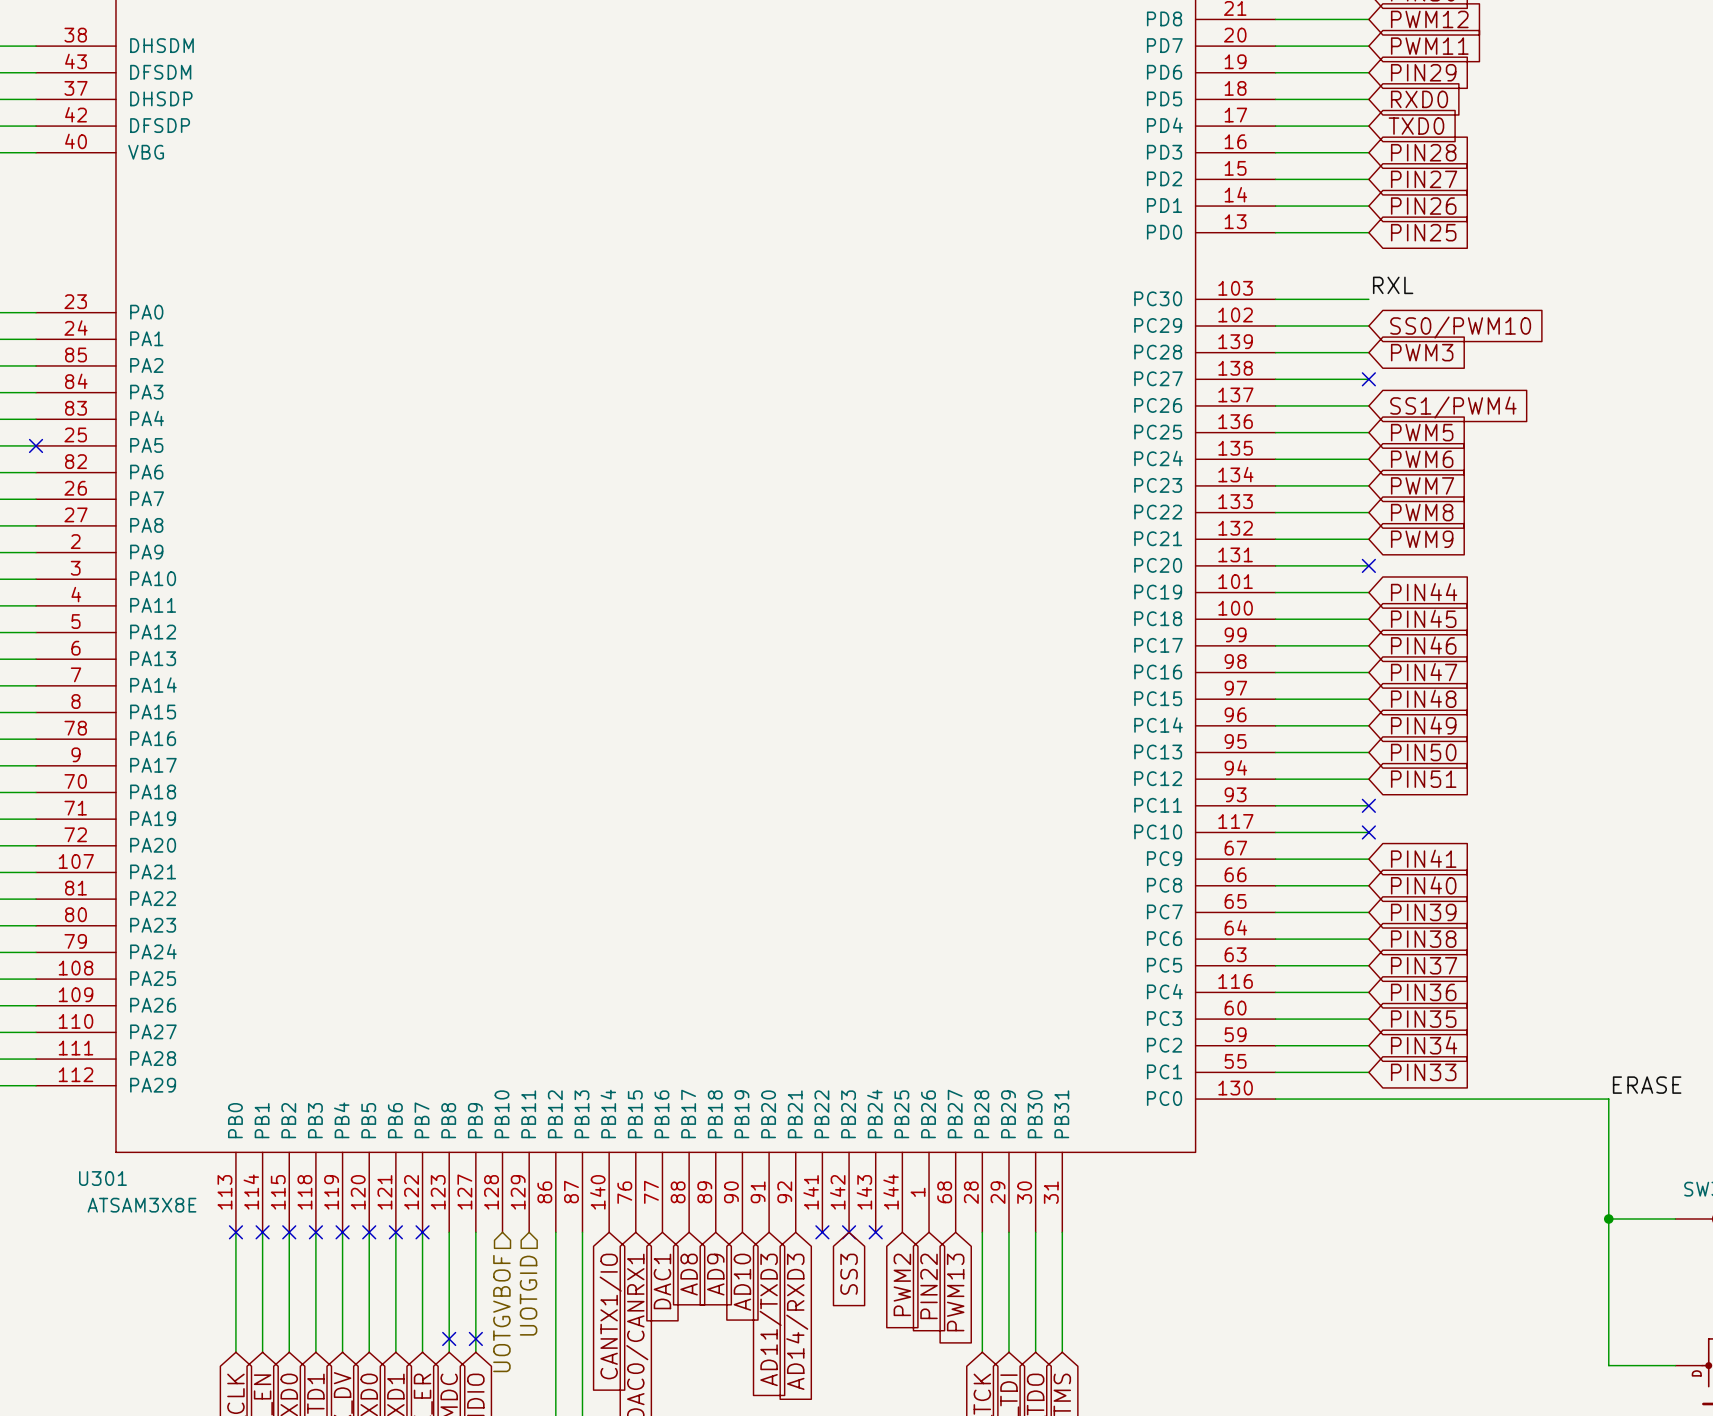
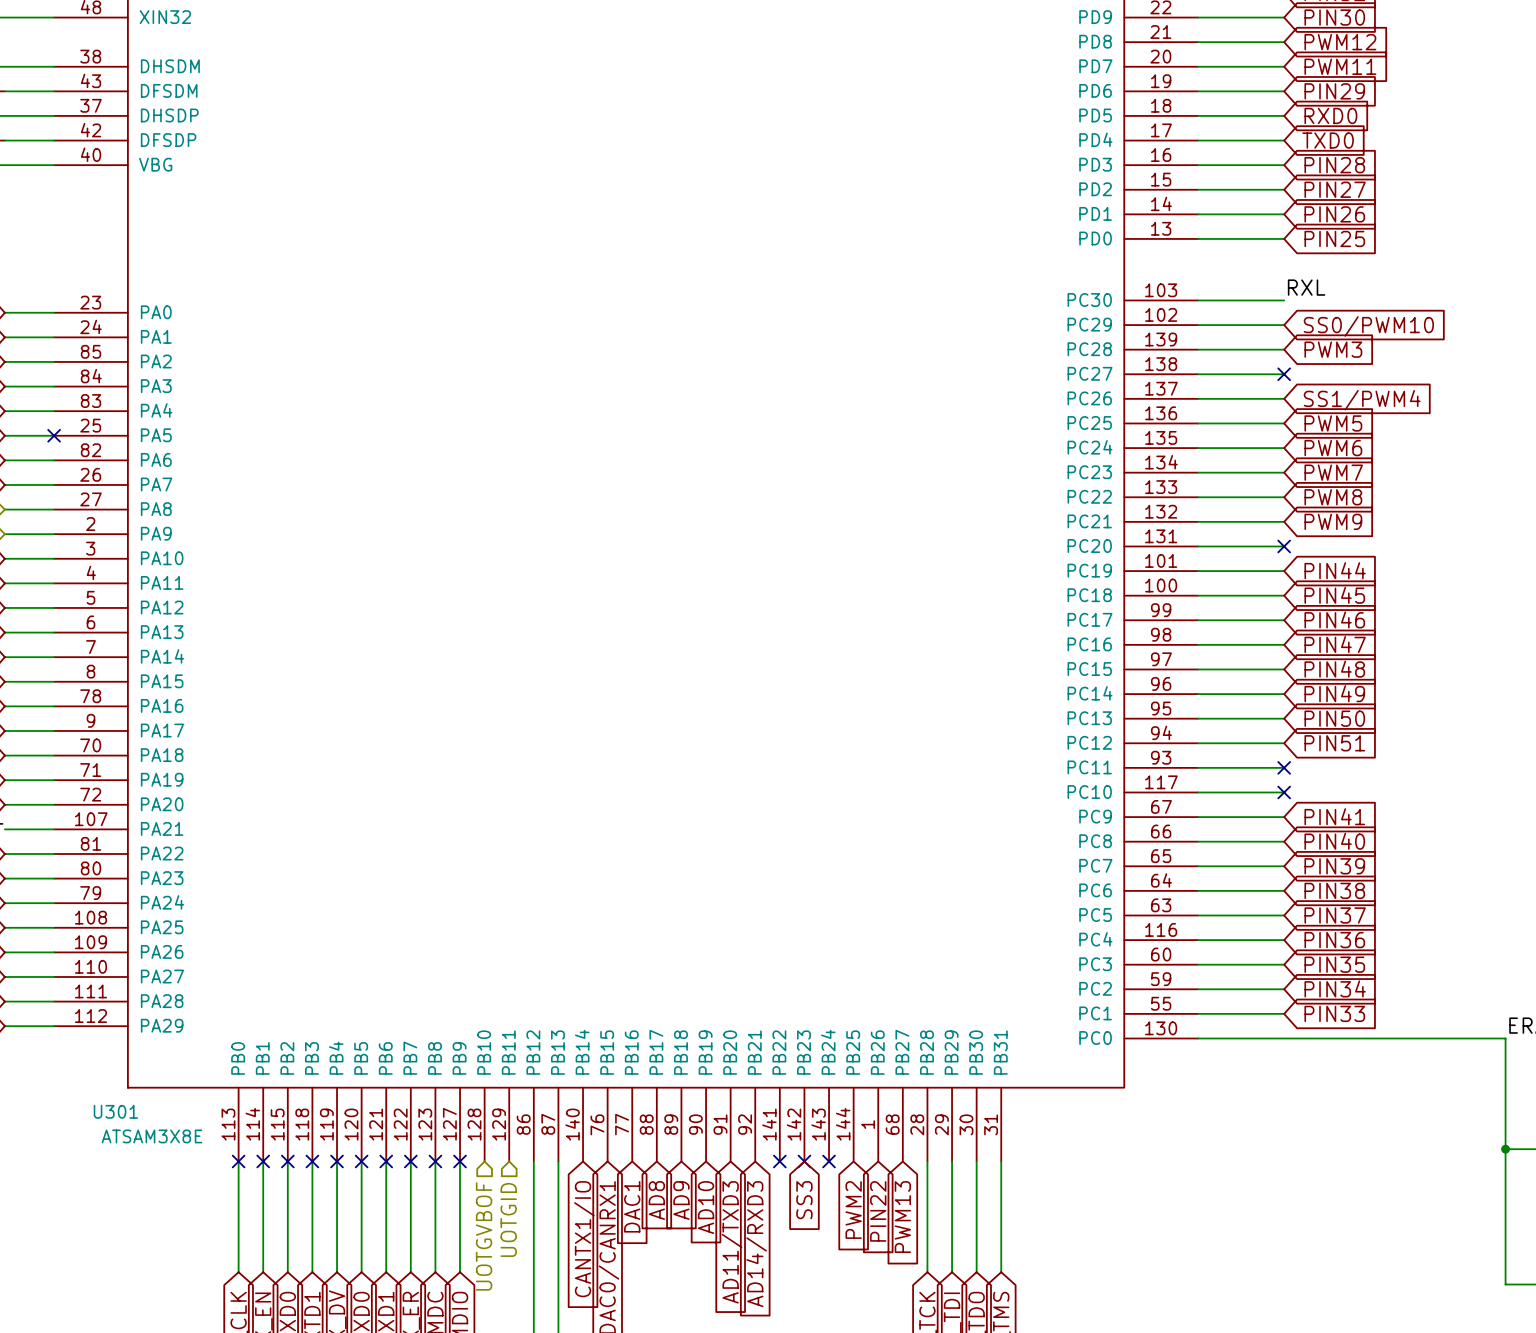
no-connect mark: none -> (435, 1161)
no-connect mark: none -> (460, 1161)
no-connect mark: (449, 1338) -> none
no-connect mark: (475, 1338) -> none

